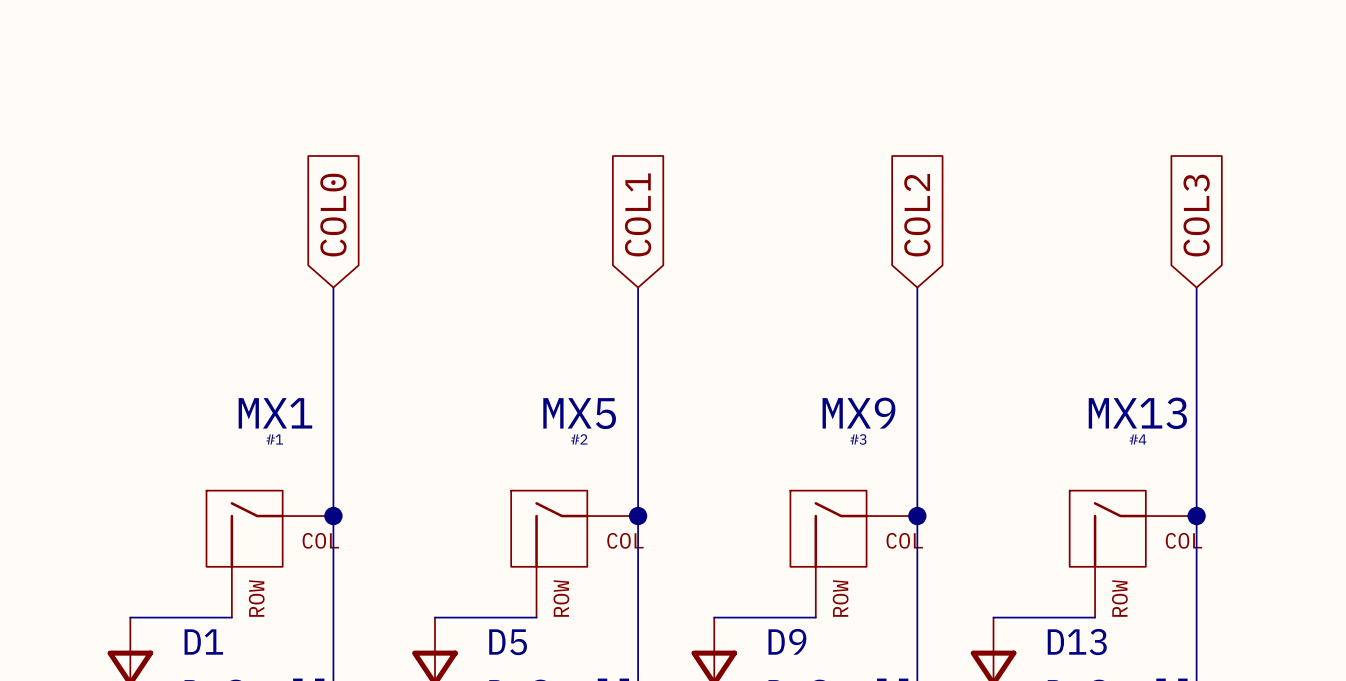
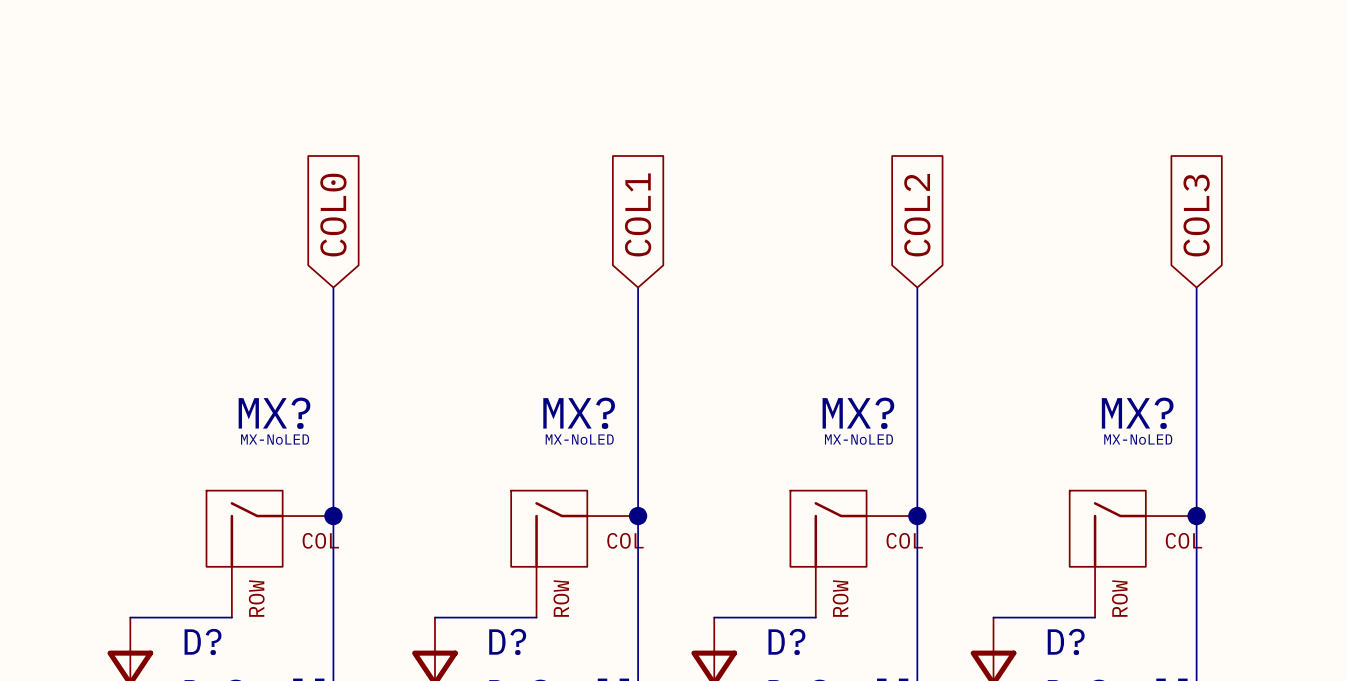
MX1 name: MX1 (275, 413) -> MX? (274, 413)
MX5 name: MX5 (579, 413) -> MX? (579, 413)
MX9 name: MX9 (858, 413) -> MX? (858, 413)
MX13 name: MX13 (1137, 413) -> MX? (1137, 413)
MX1 value: #1 (274, 439) -> MX-NoLED (275, 439)
MX5 value: #2 (579, 439) -> MX-NoLED (579, 439)
MX9 value: #3 (858, 439) -> MX-NoLED (858, 439)
MX13 value: #4 (1137, 439) -> MX-NoLED (1138, 439)
D9 name: D9 (787, 641) -> D? (786, 641)
D1 name: D1 (203, 642) -> D? (203, 641)
D5 name: D5 (508, 642) -> D? (507, 641)
D13 name: D13 (1077, 642) -> D? (1066, 641)

